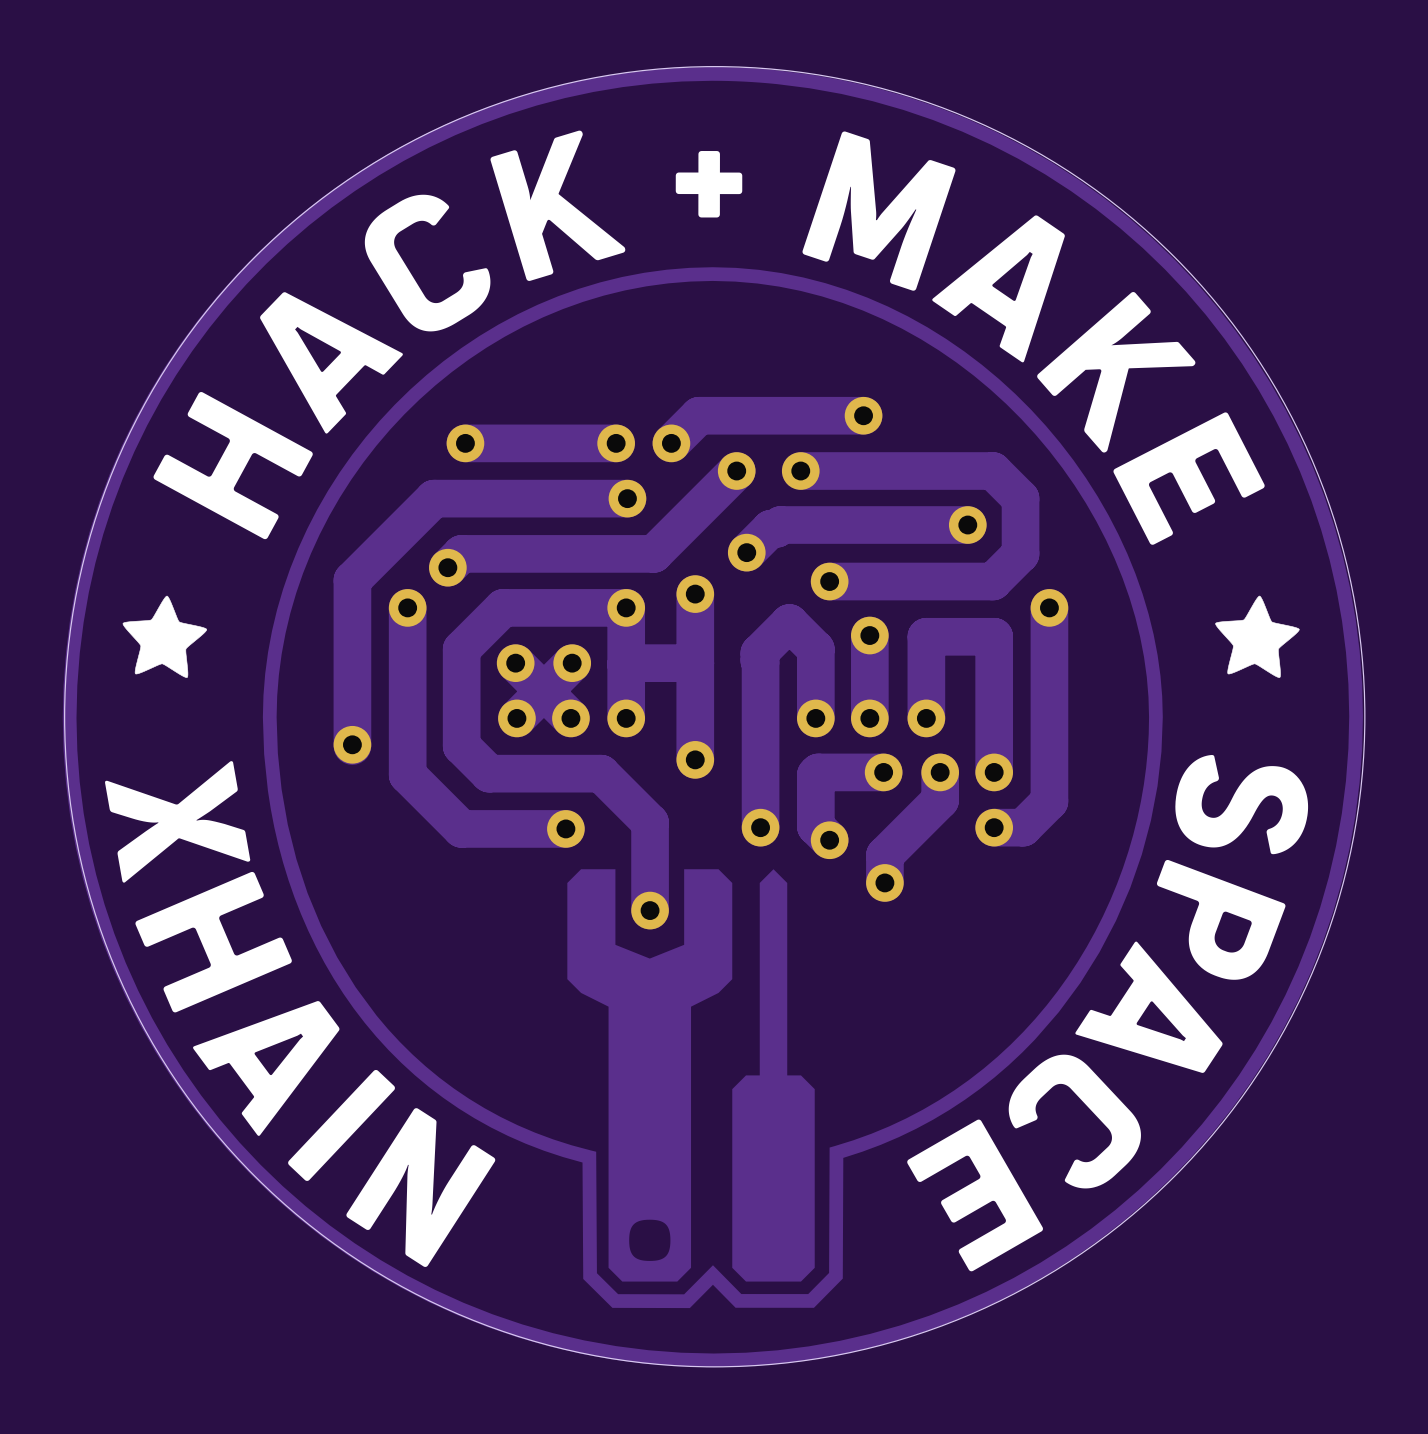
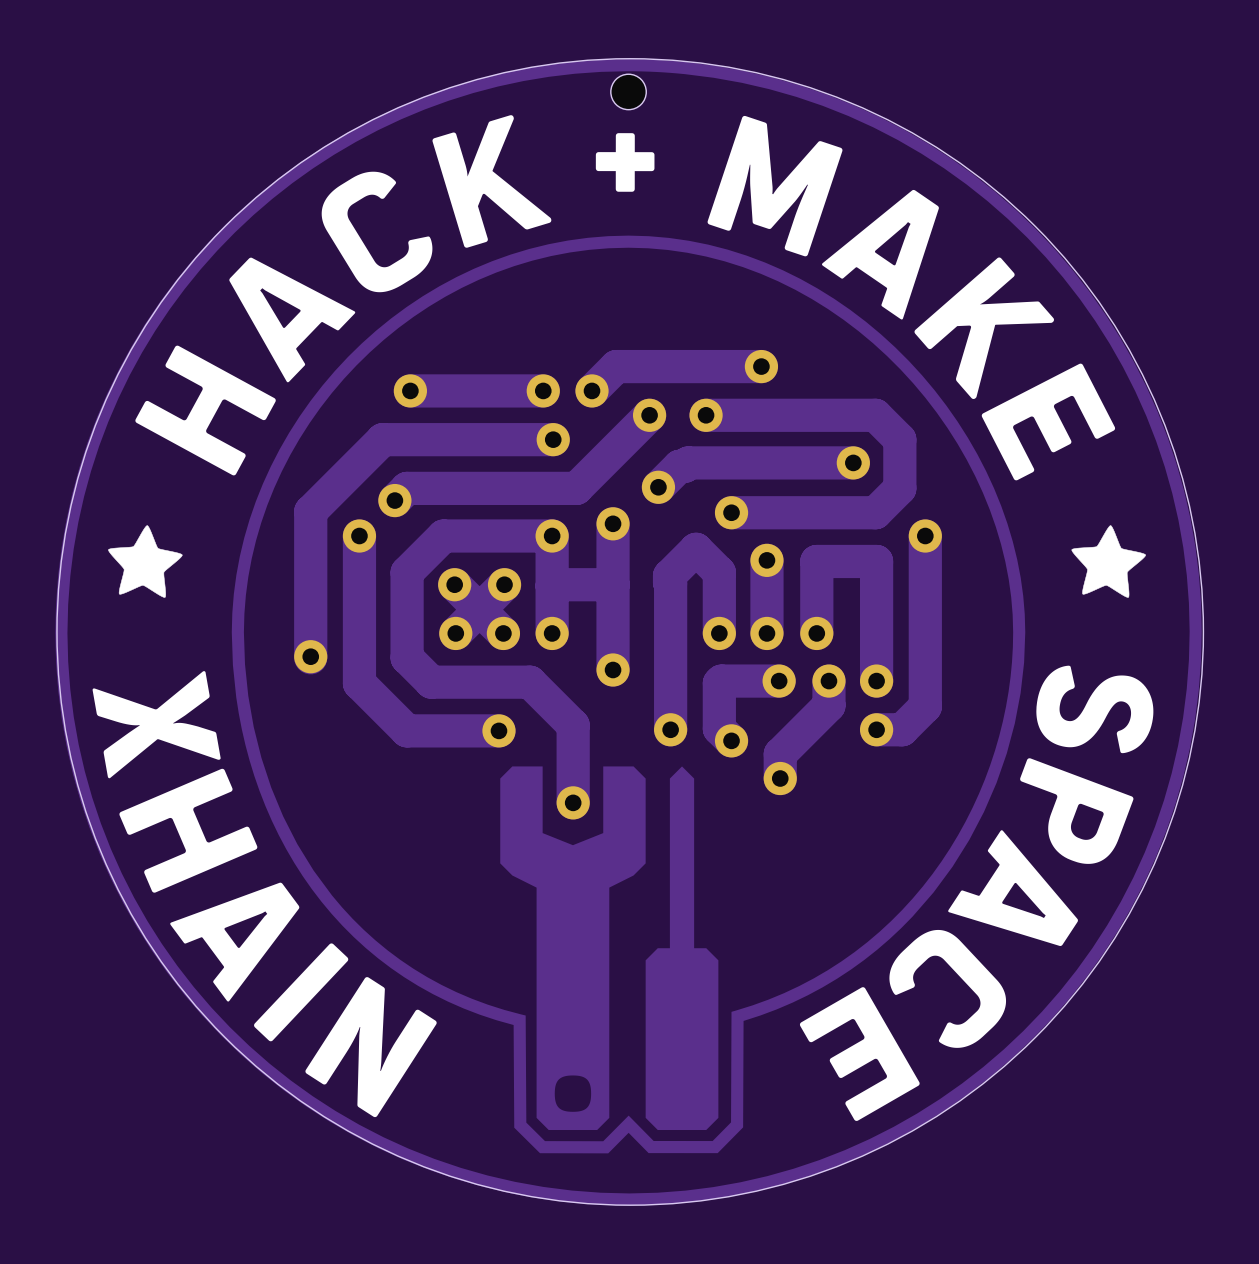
part: none -> (628, 91)

